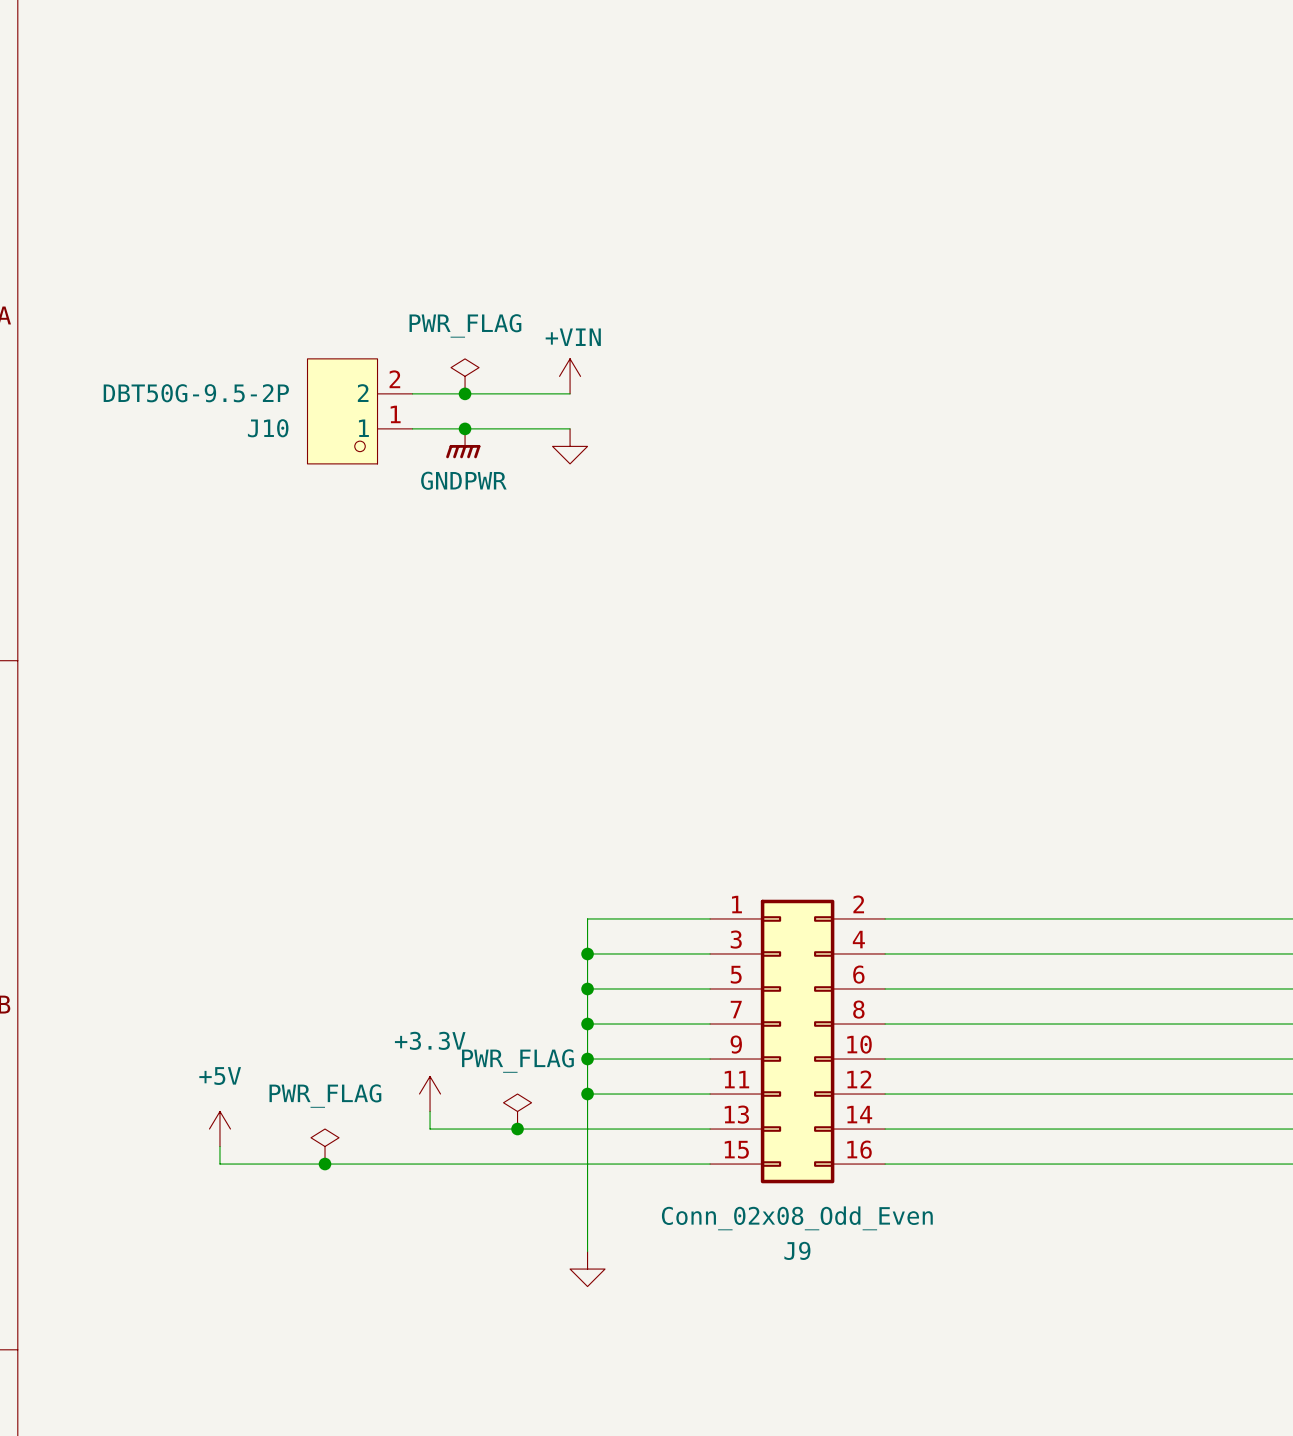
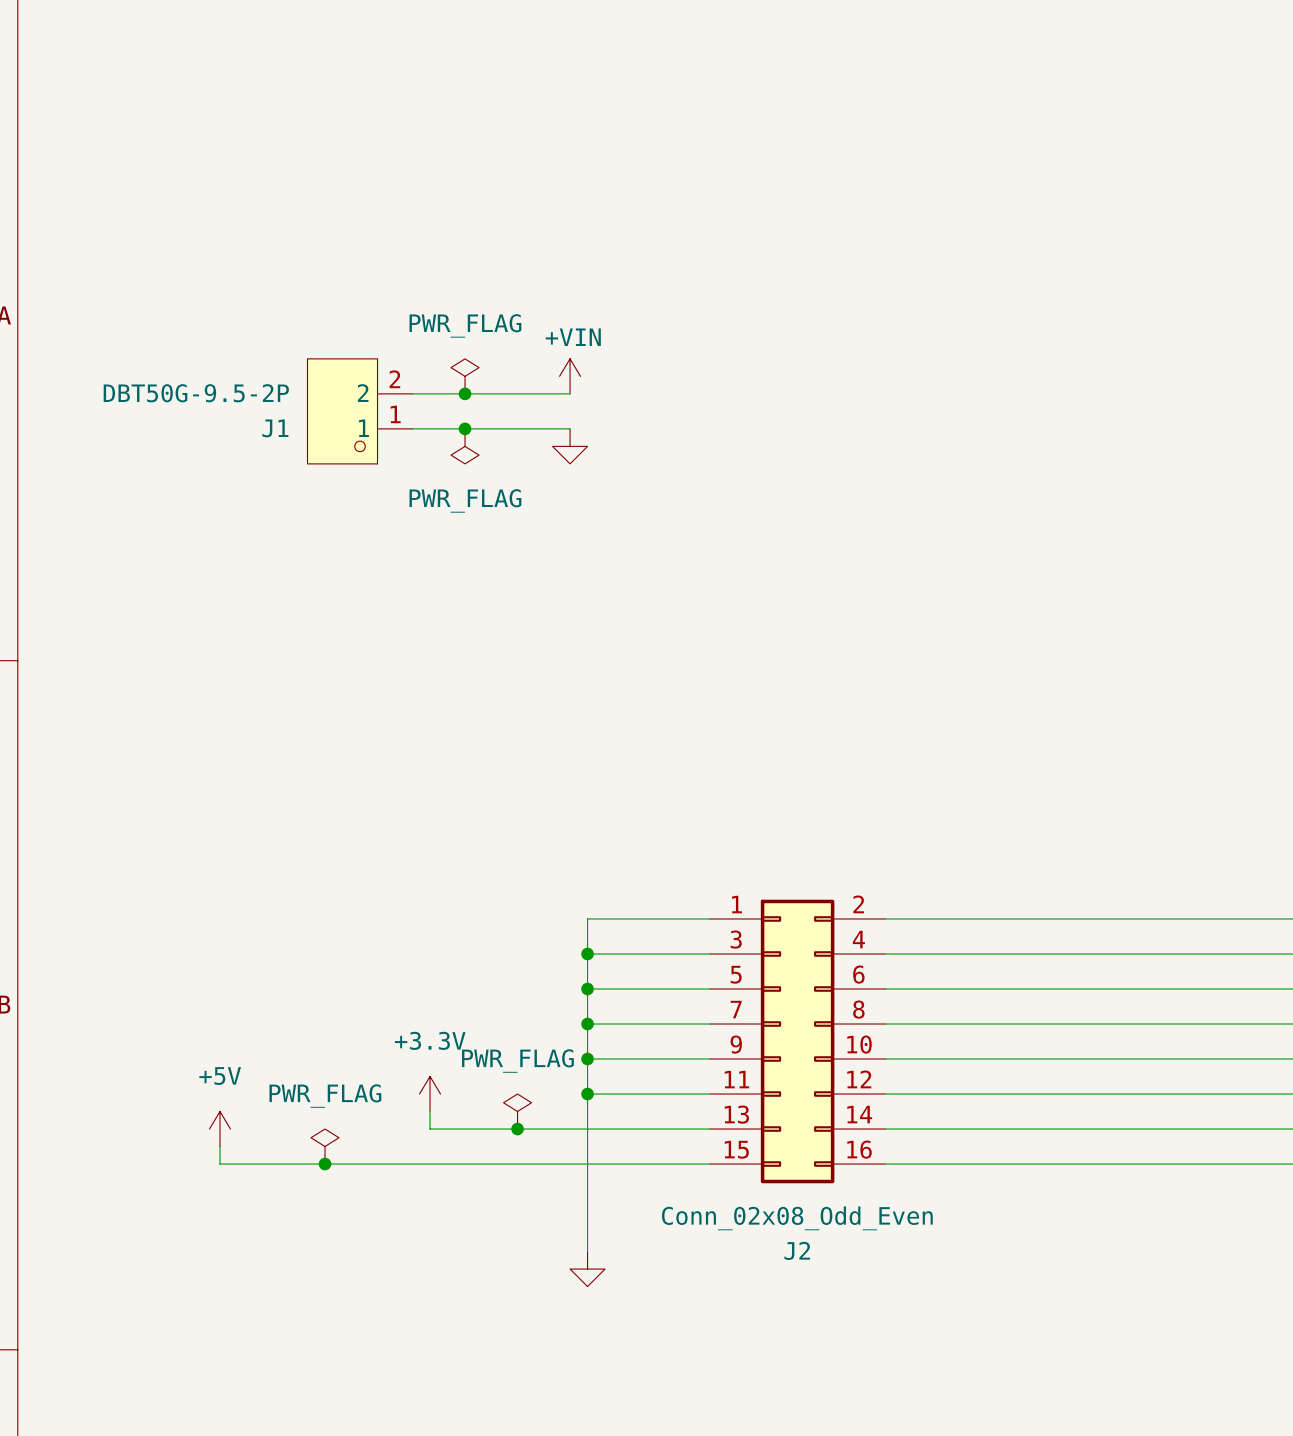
J10 name: J10 (268, 428) -> J1 (275, 428)
power symbol: GNDPWR (463, 443) -> PWR_FLAG (465, 446)
J9 name: J9 (797, 1250) -> J2 (797, 1250)

